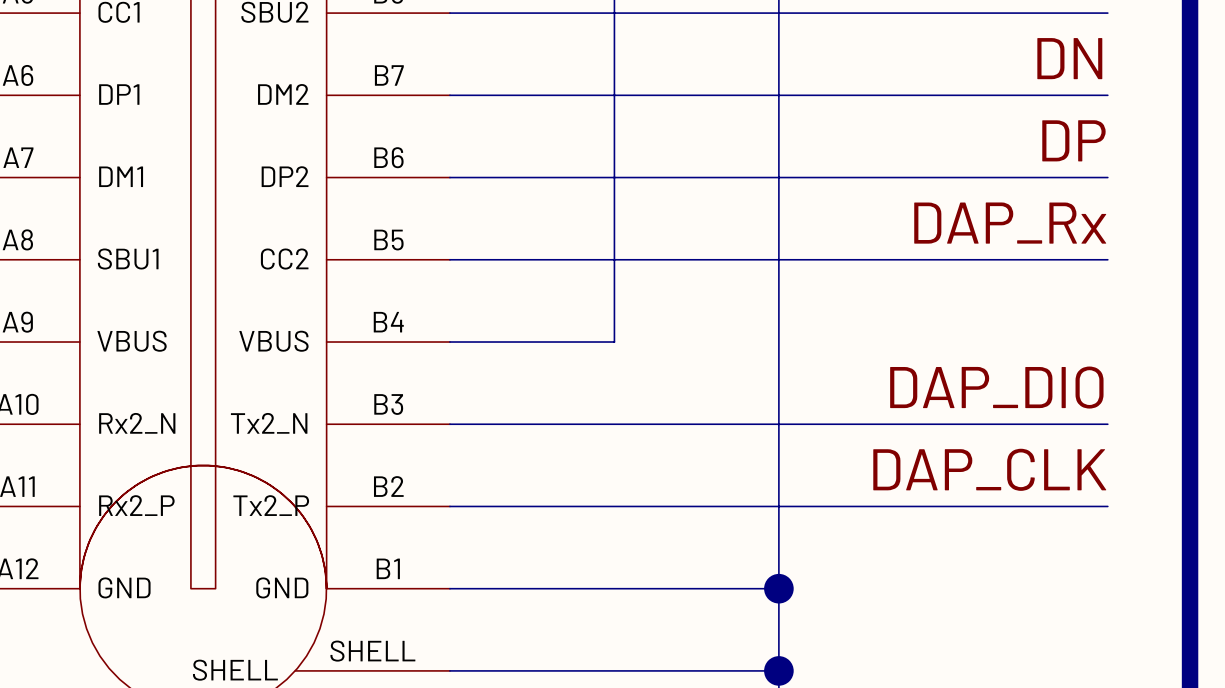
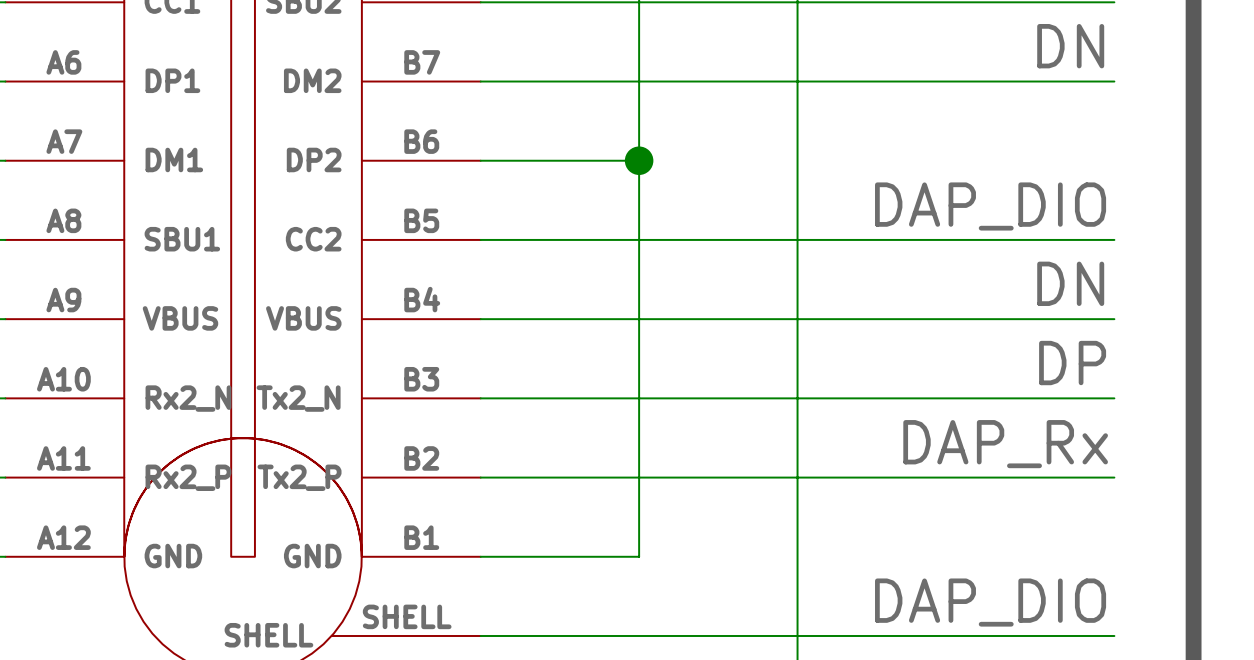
label: DP (1073, 140) -> none
wire: (614, 177) (1107, 177) -> none
junction: none -> (639, 160)
label: DAP_Rx (1010, 223) -> DAP_DIO (990, 206)
label: none -> DN (1070, 283)
label: DAP_DIO (996, 387) -> DP (1072, 363)
label: DAP_CLK (989, 469) -> DAP_Rx (1005, 444)
wire: (614, 588) (778, 588) -> (639, 556) (639, 319) (1114, 319)
junction: (778, 588) -> none
label: none -> DAP_DIO (990, 602)
wire: none -> (797, 635) (1114, 635)
junction: (778, 670) -> none

